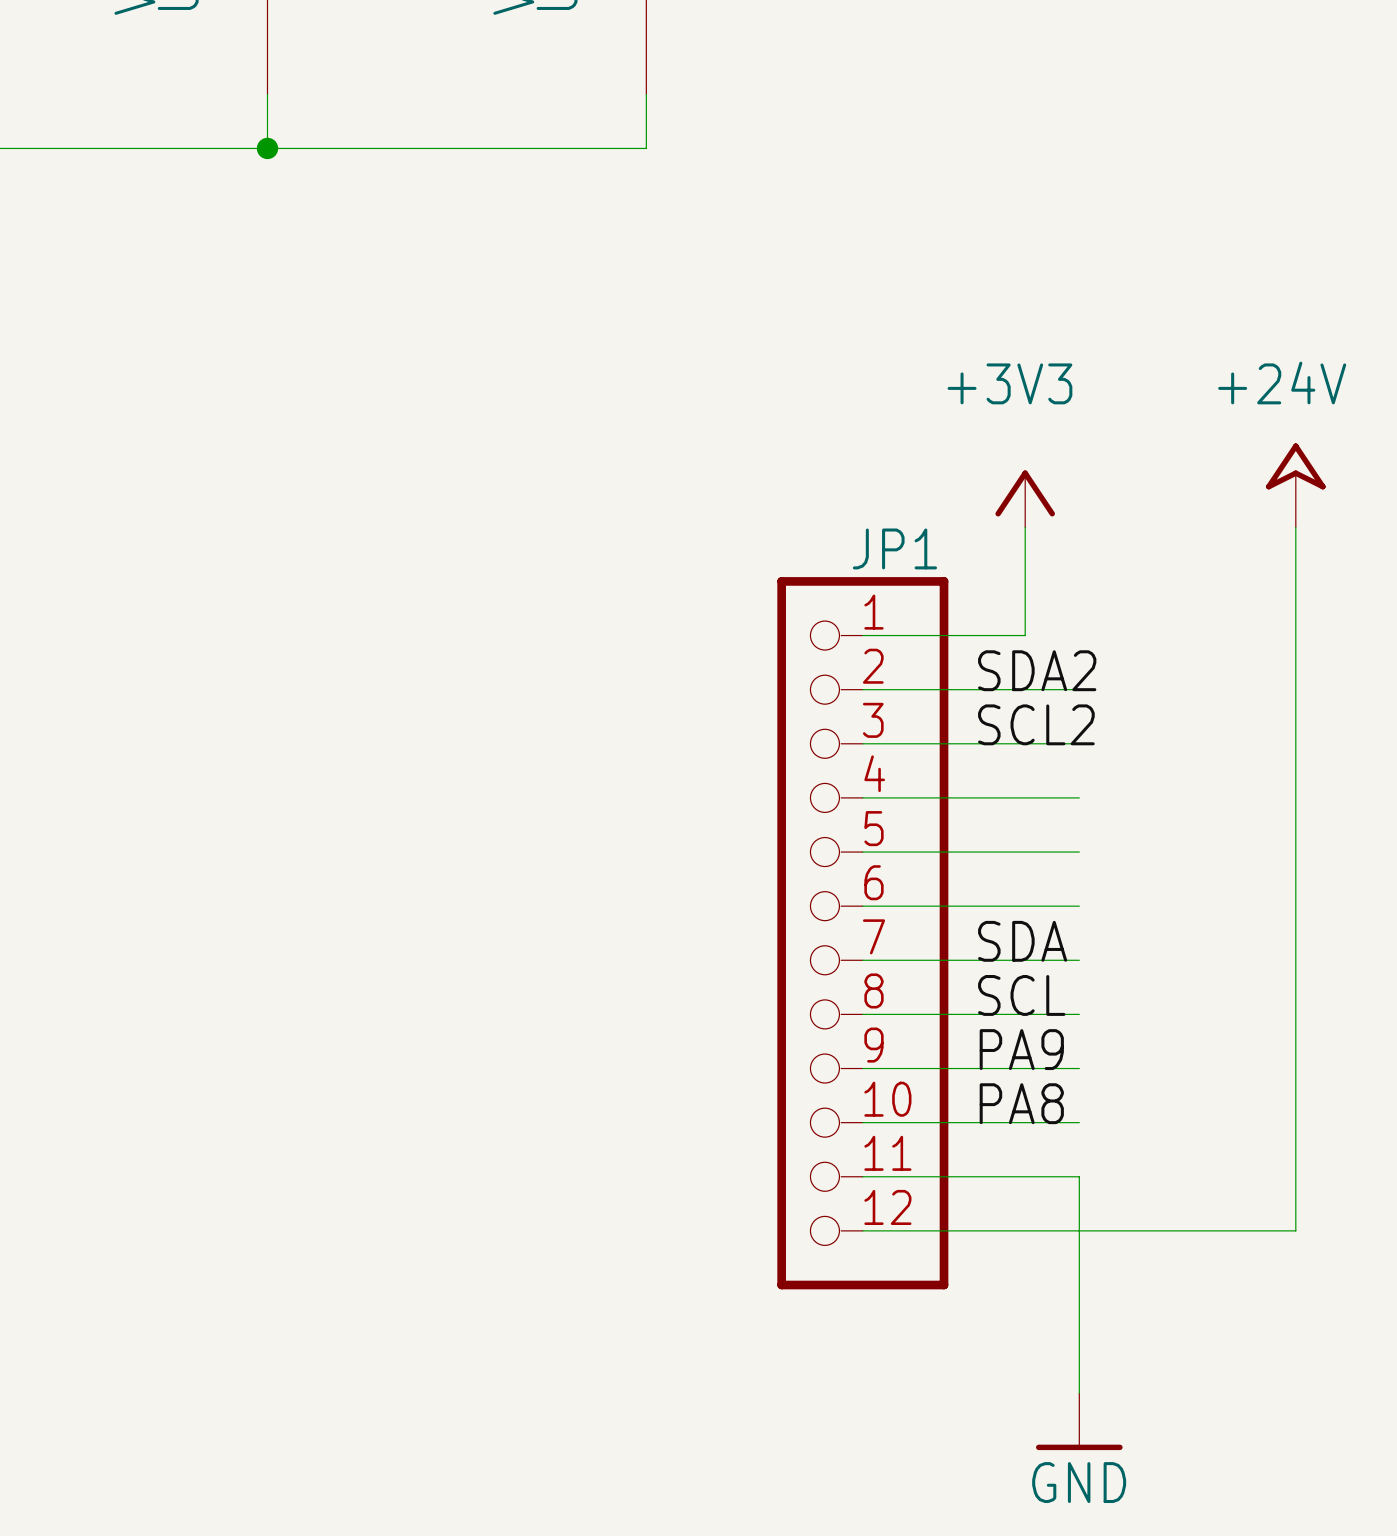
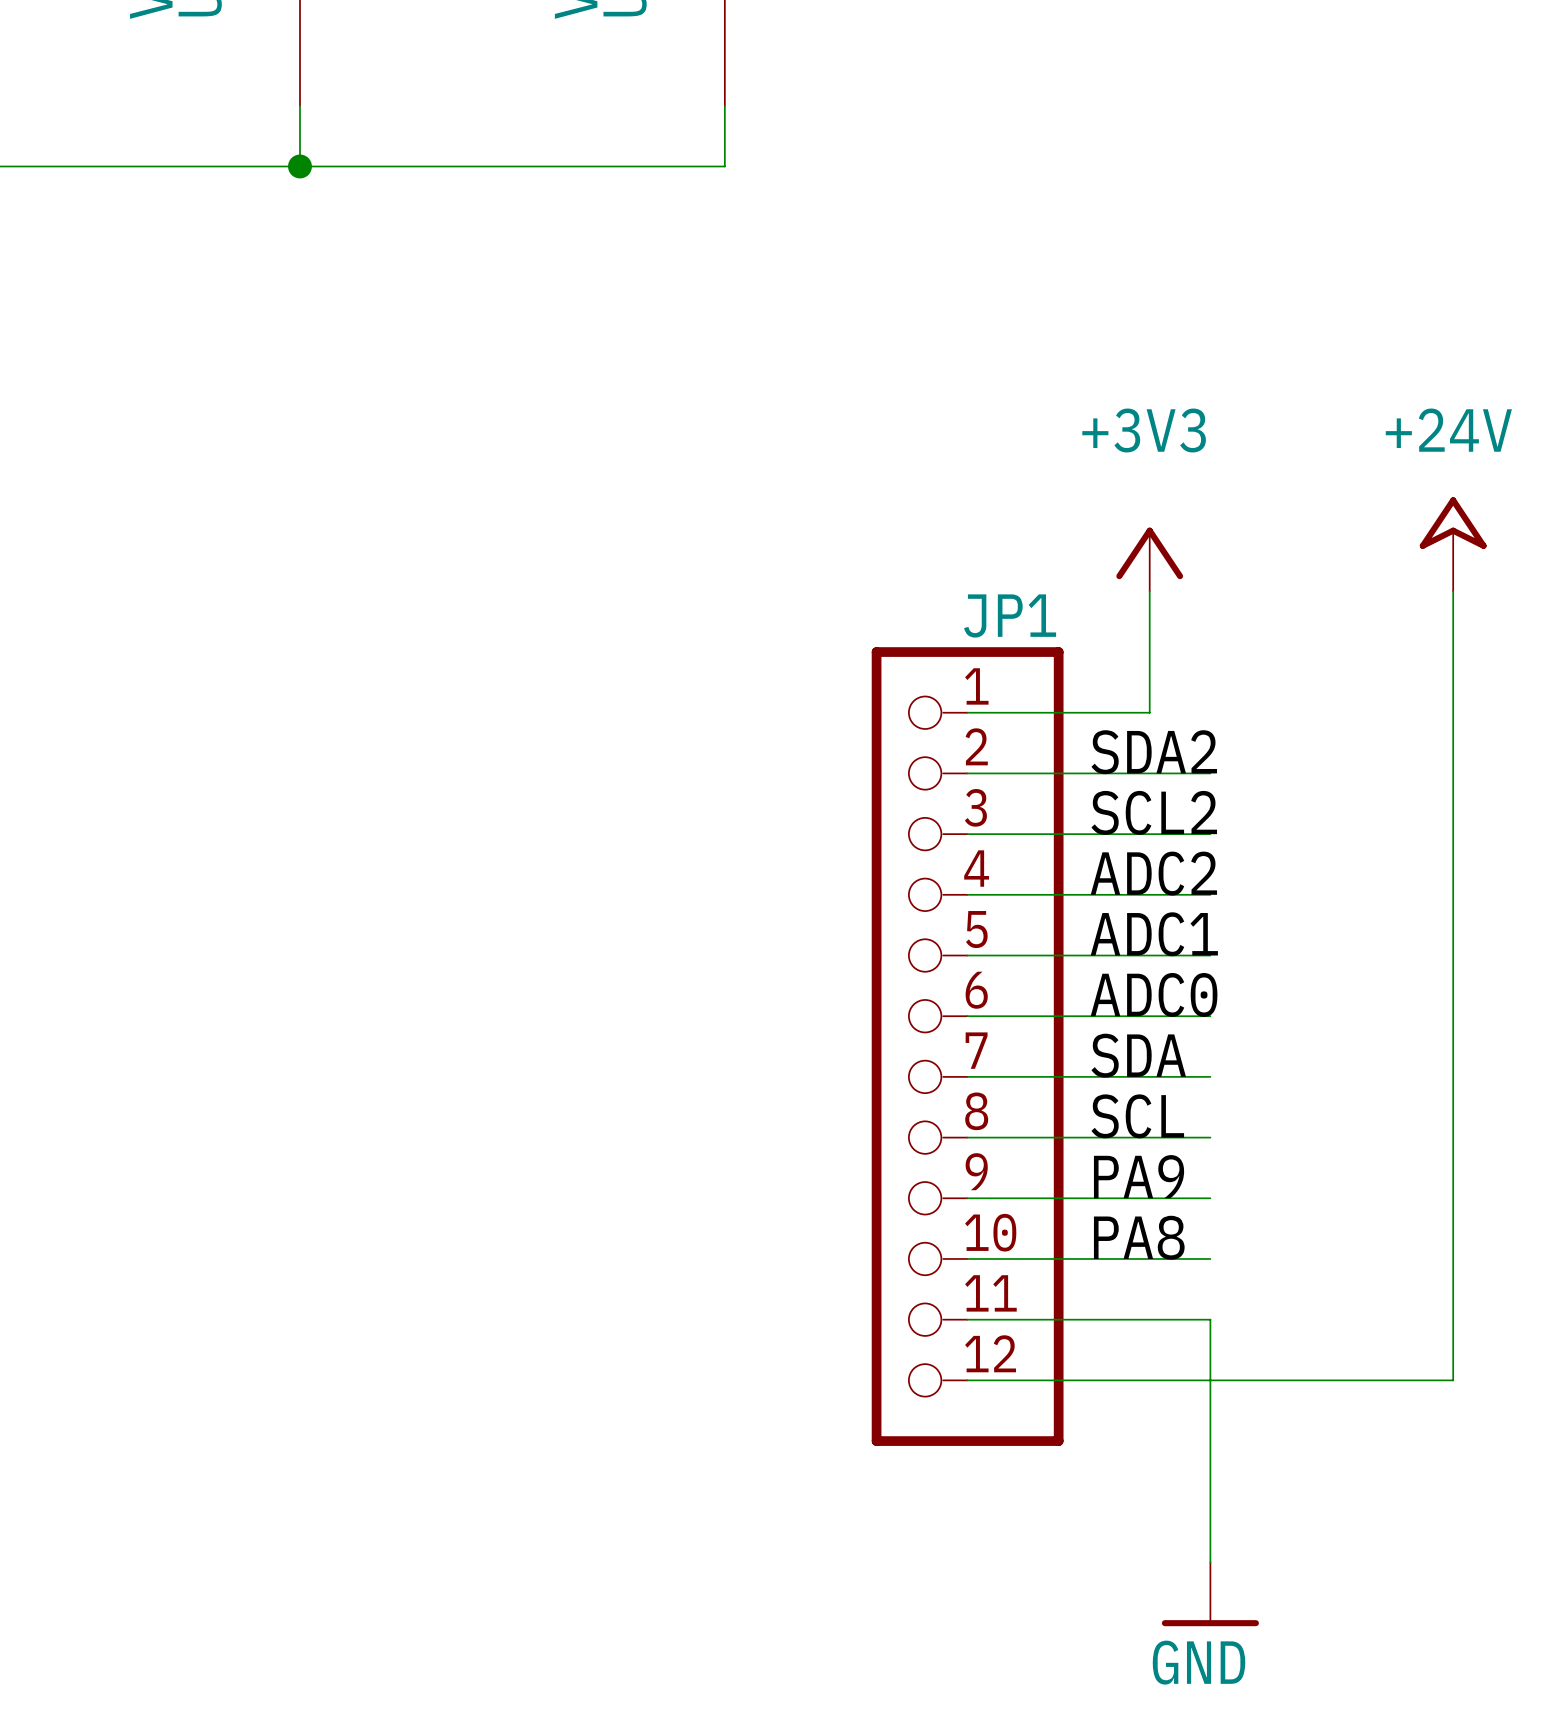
label: none -> ADC2 (1153, 873)
label: none -> ADC1 (1154, 934)
label: none -> ADC0 (1154, 994)

